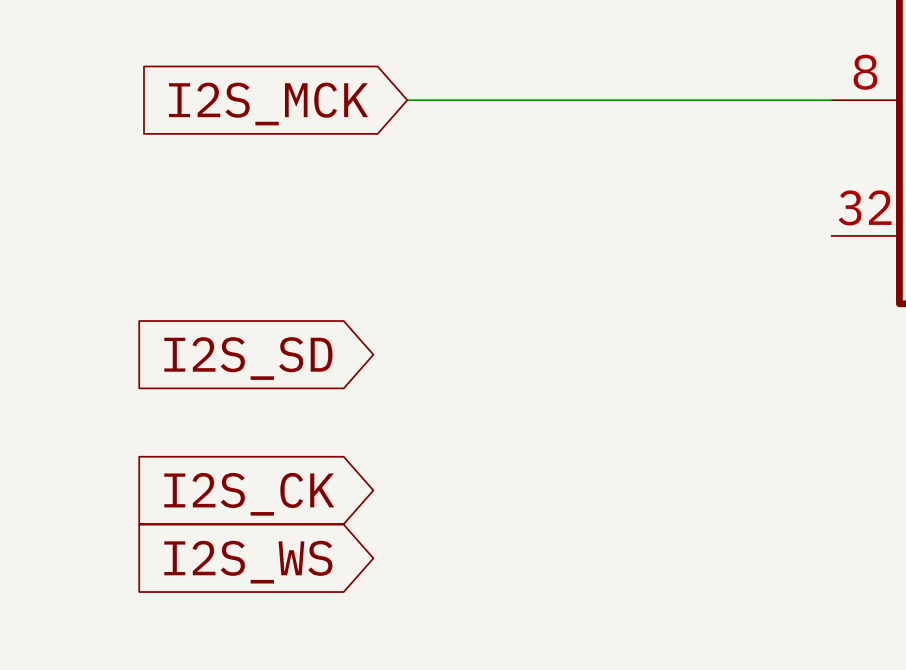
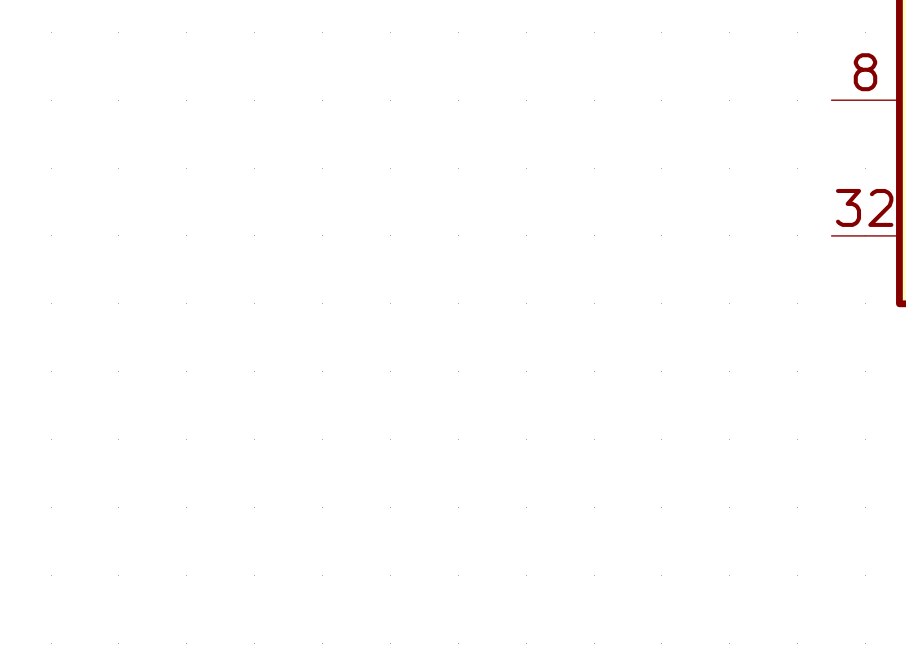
wire: (407, 100) (831, 100) -> none
global label: I2S_MCK (268, 104) -> none
global label: I2S_SD (248, 358) -> none
global label: I2S_CK (249, 494) -> none
global label: I2S_WS (248, 562) -> none

